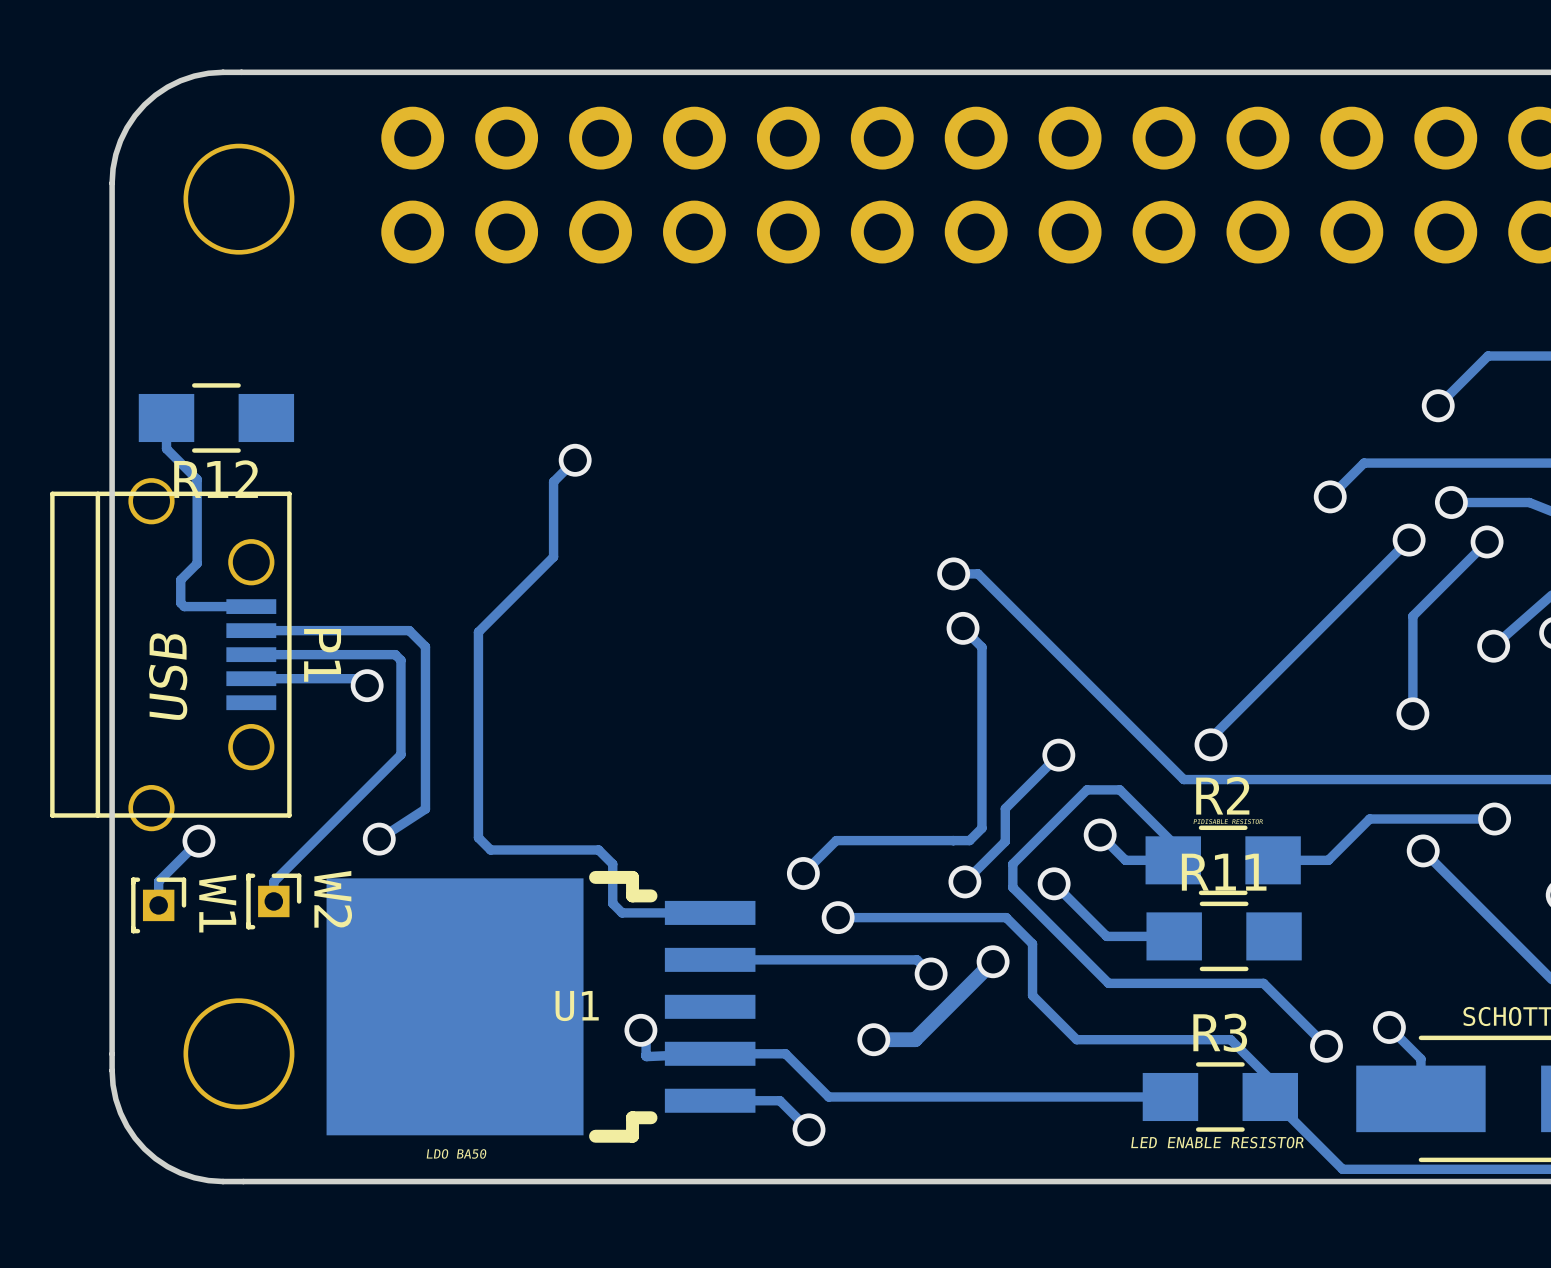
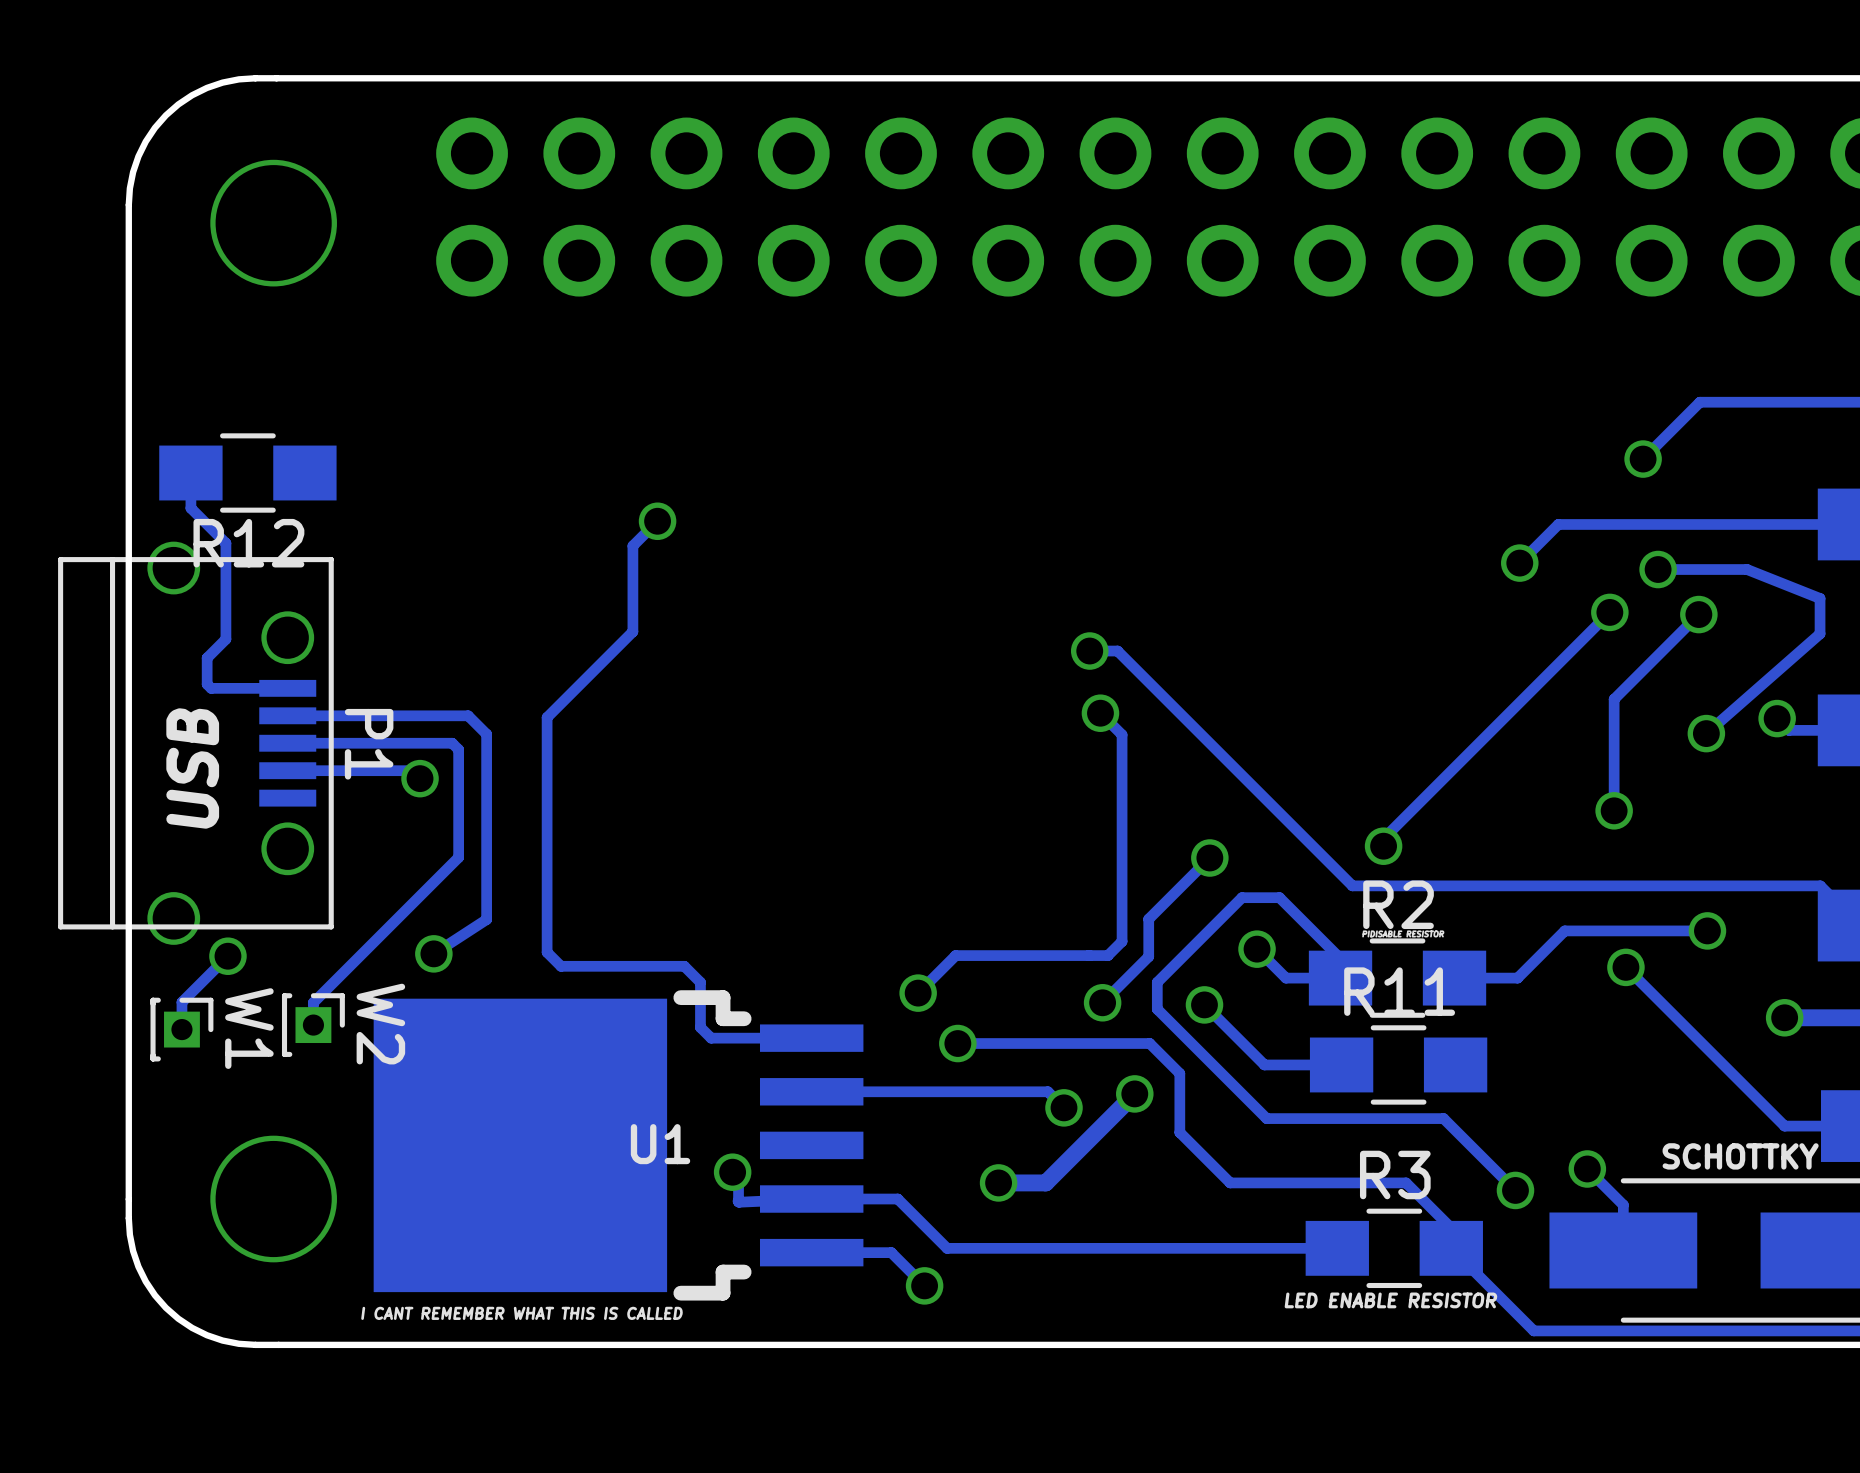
text: LDO BA50 (456, 1153) -> I CANT REMEMBER WHAT THIS IS CALLED (522, 1313)

